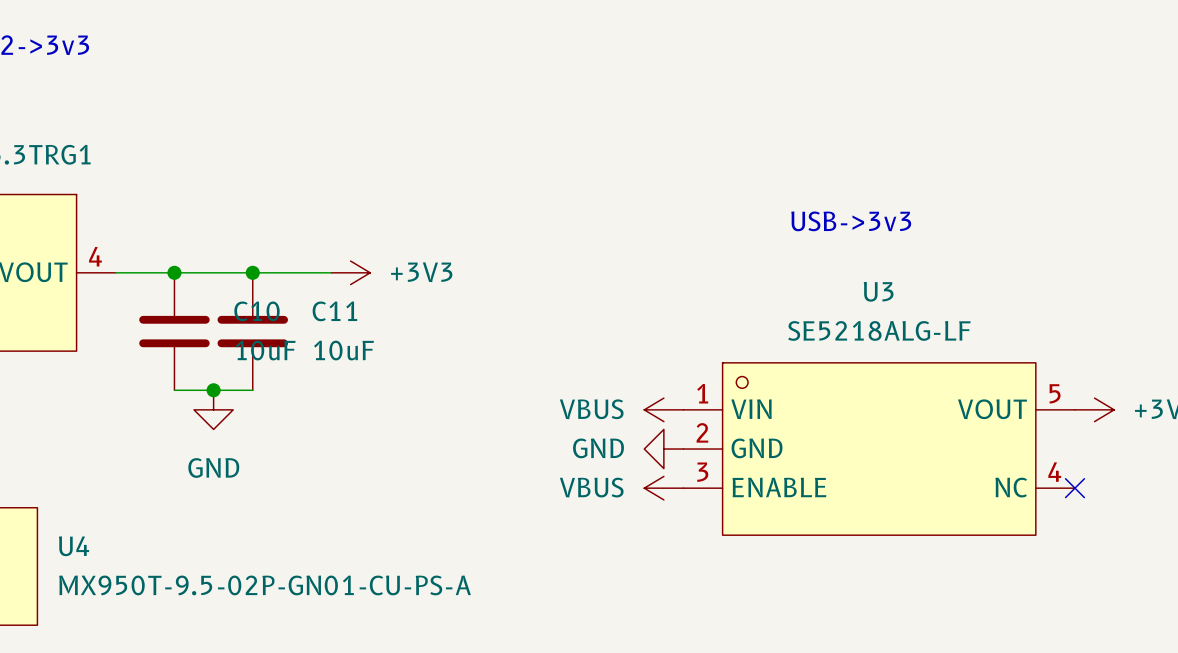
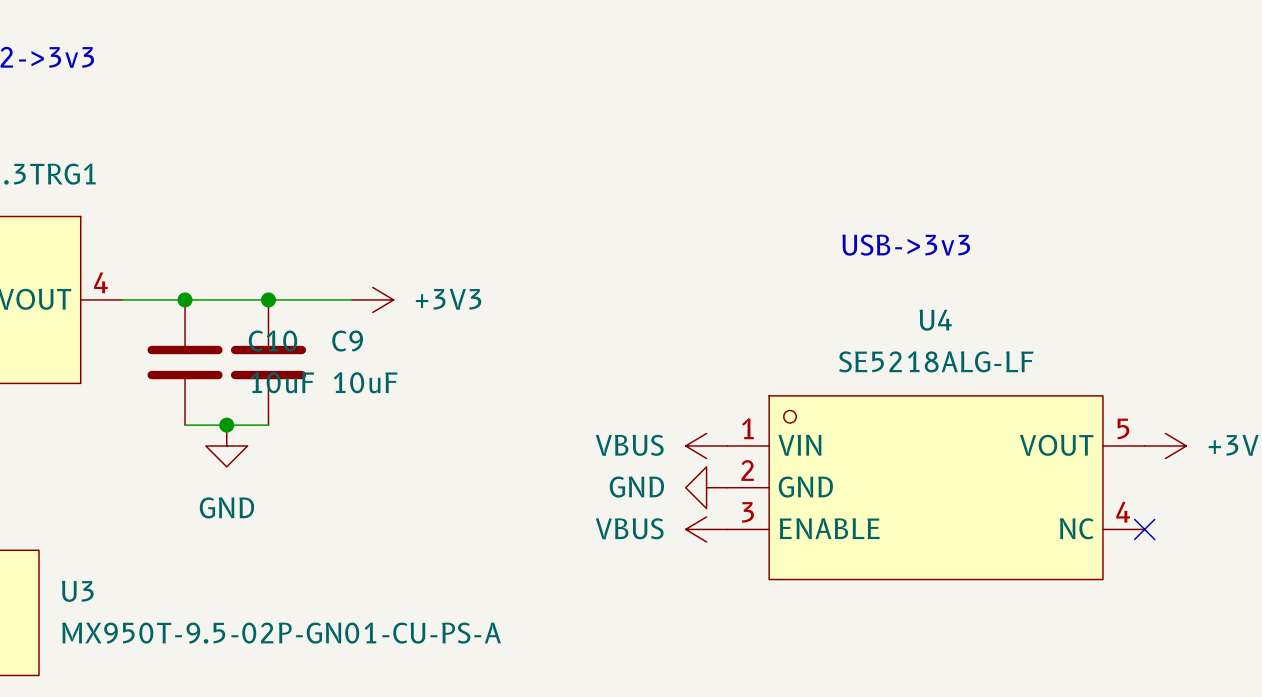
U3 name: U3 (878, 291) -> U4 (935, 320)
C11 name: C11 (334, 311) -> C9 (347, 341)
U4 name: U4 (74, 546) -> U3 (77, 591)

